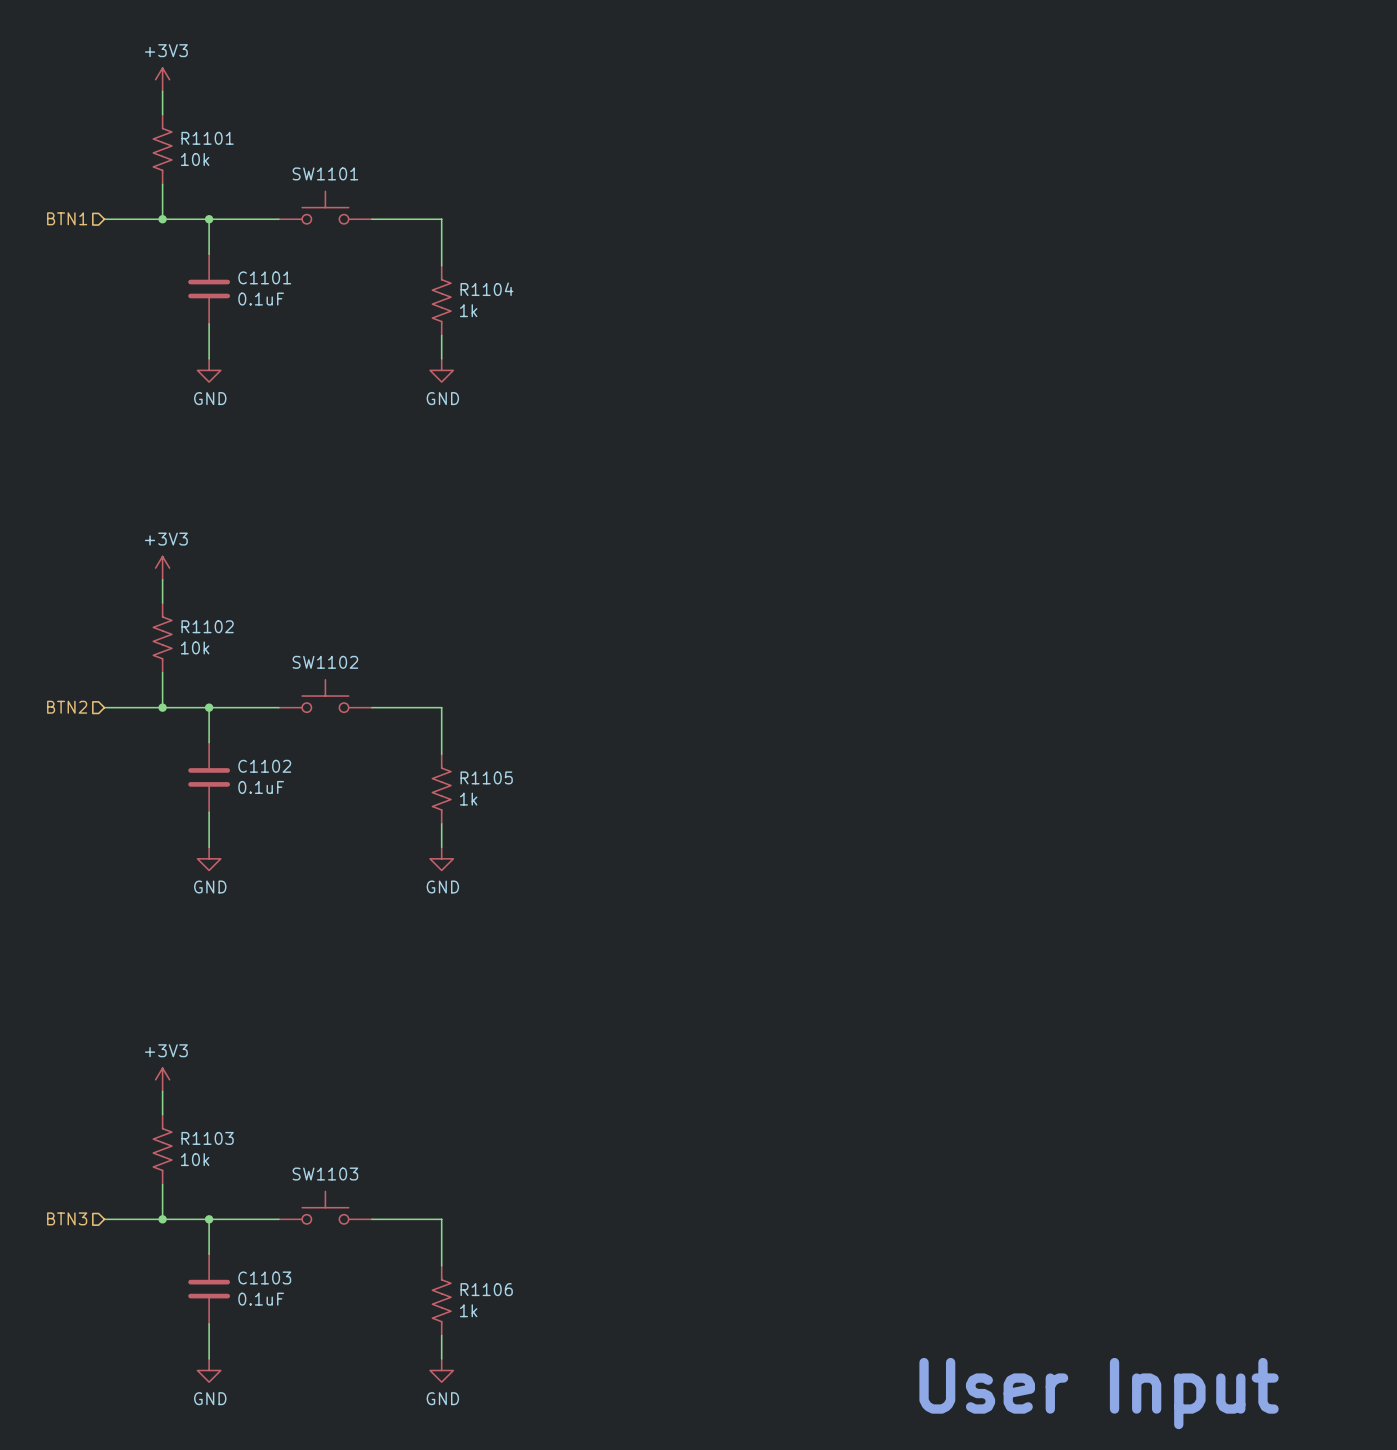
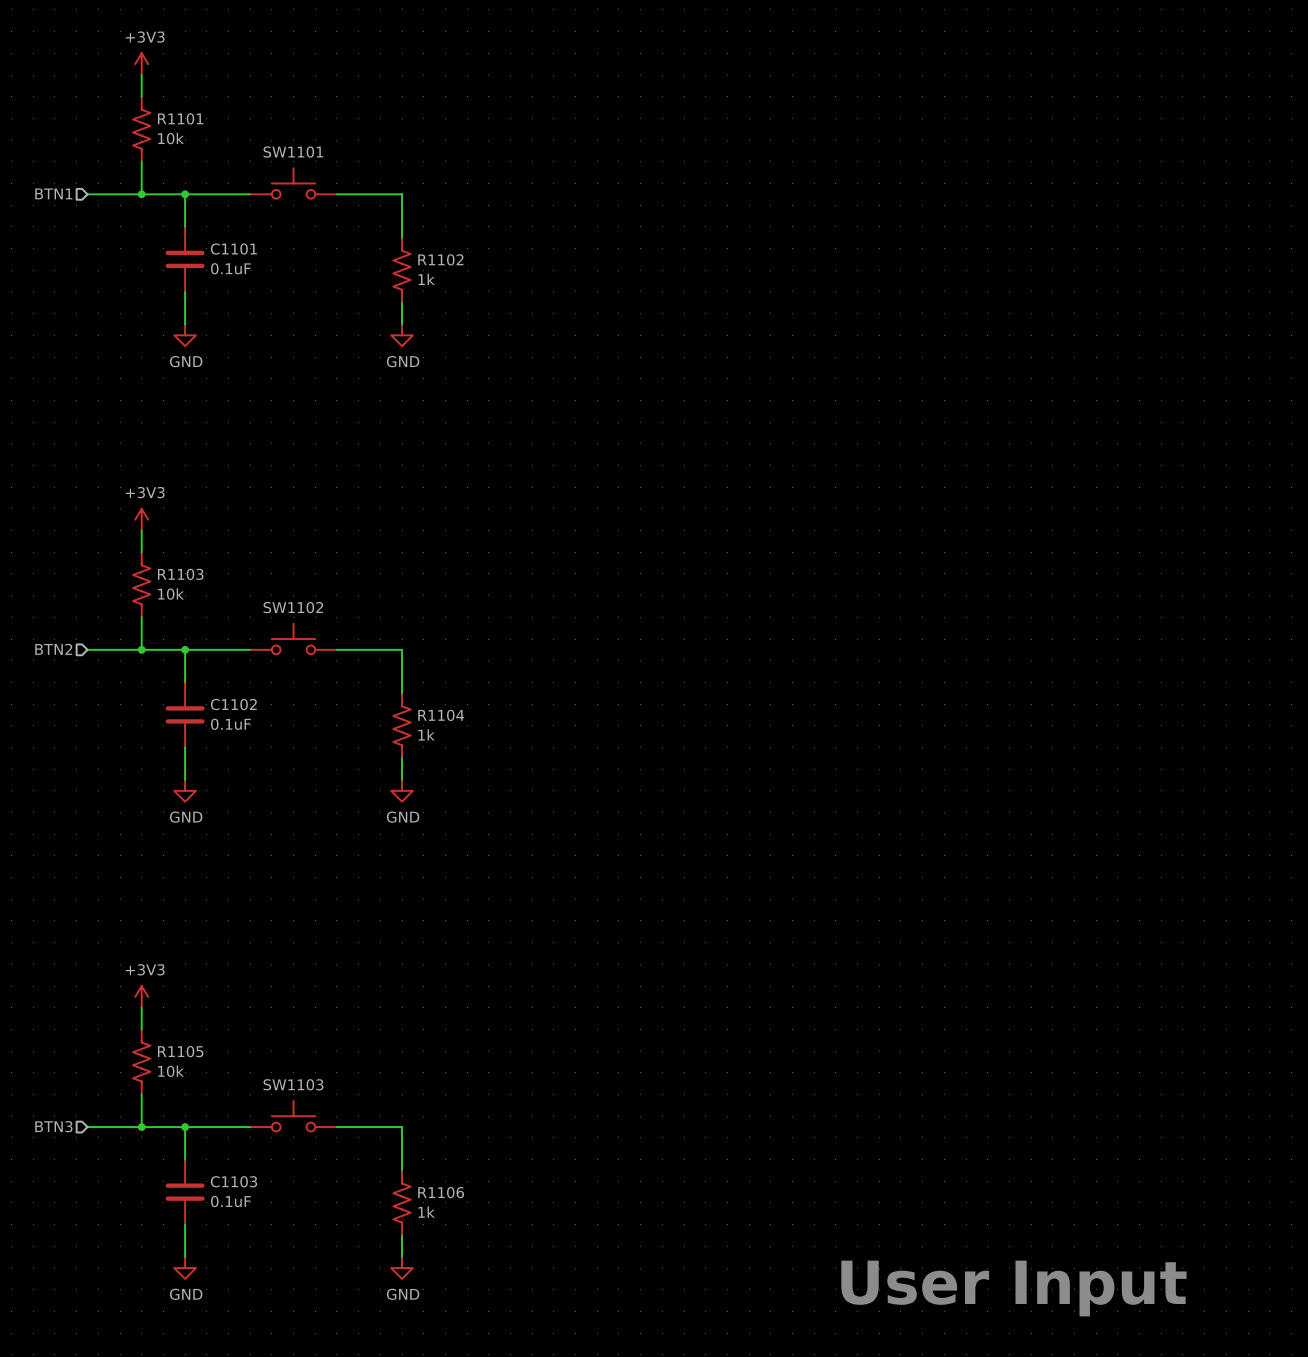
R1104 name: R1104 (486, 289) -> R1102 (440, 259)
R1102 name: R1102 (207, 626) -> R1103 (180, 574)
R1105 name: R1105 (486, 777) -> R1104 (441, 715)
R1103 name: R1103 (207, 1138) -> R1105 (180, 1051)

